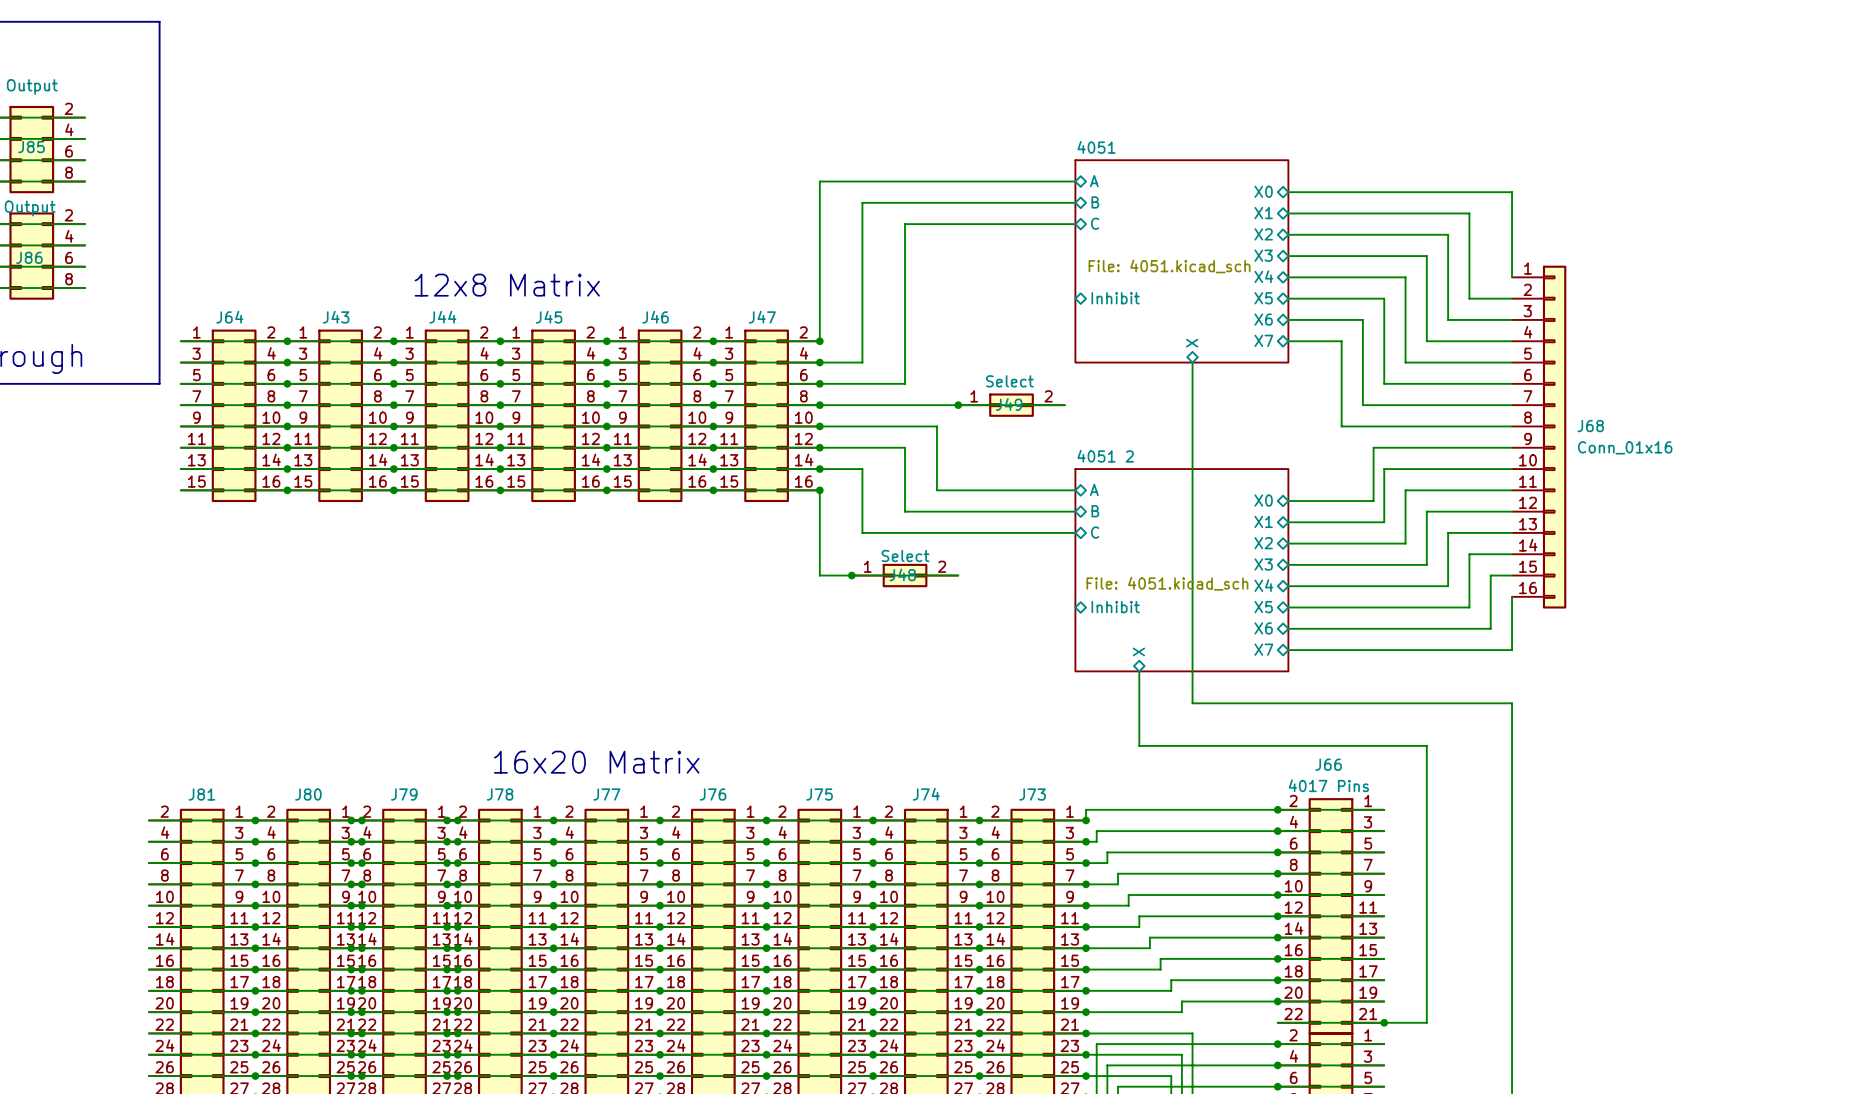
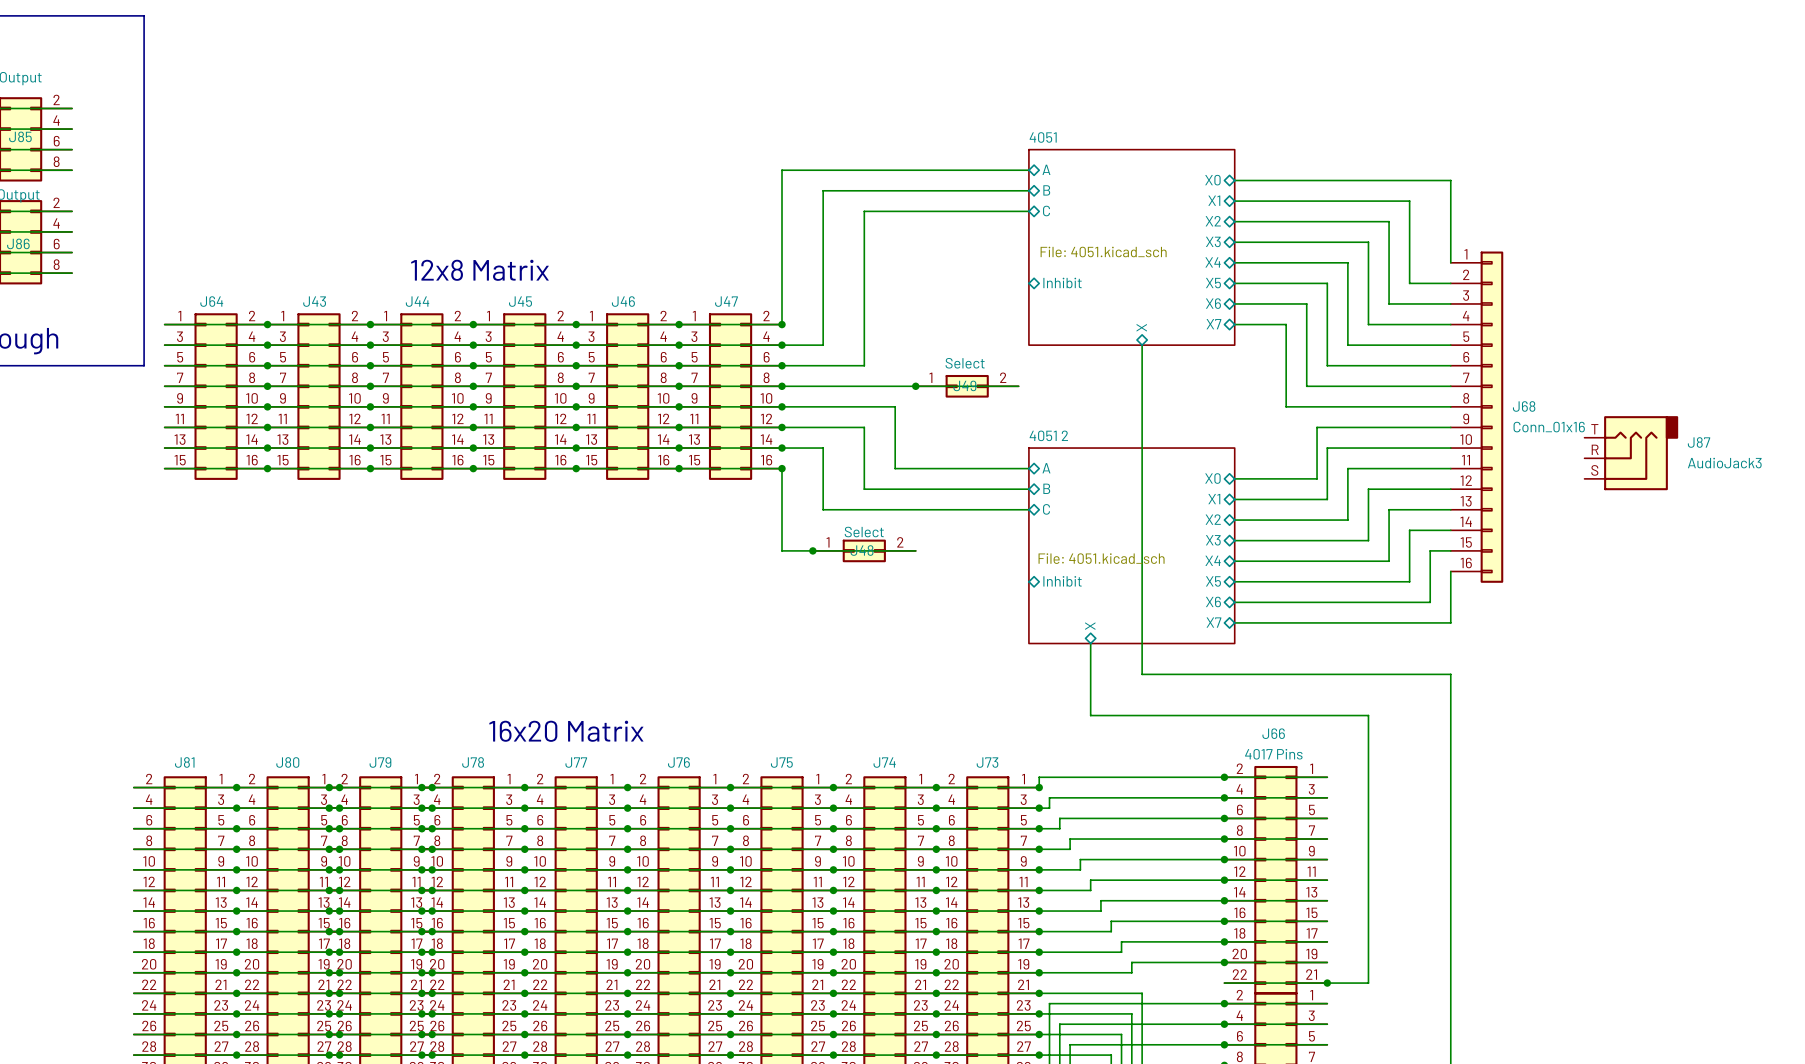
J87: none -> AudioJack3 (1631, 453)

